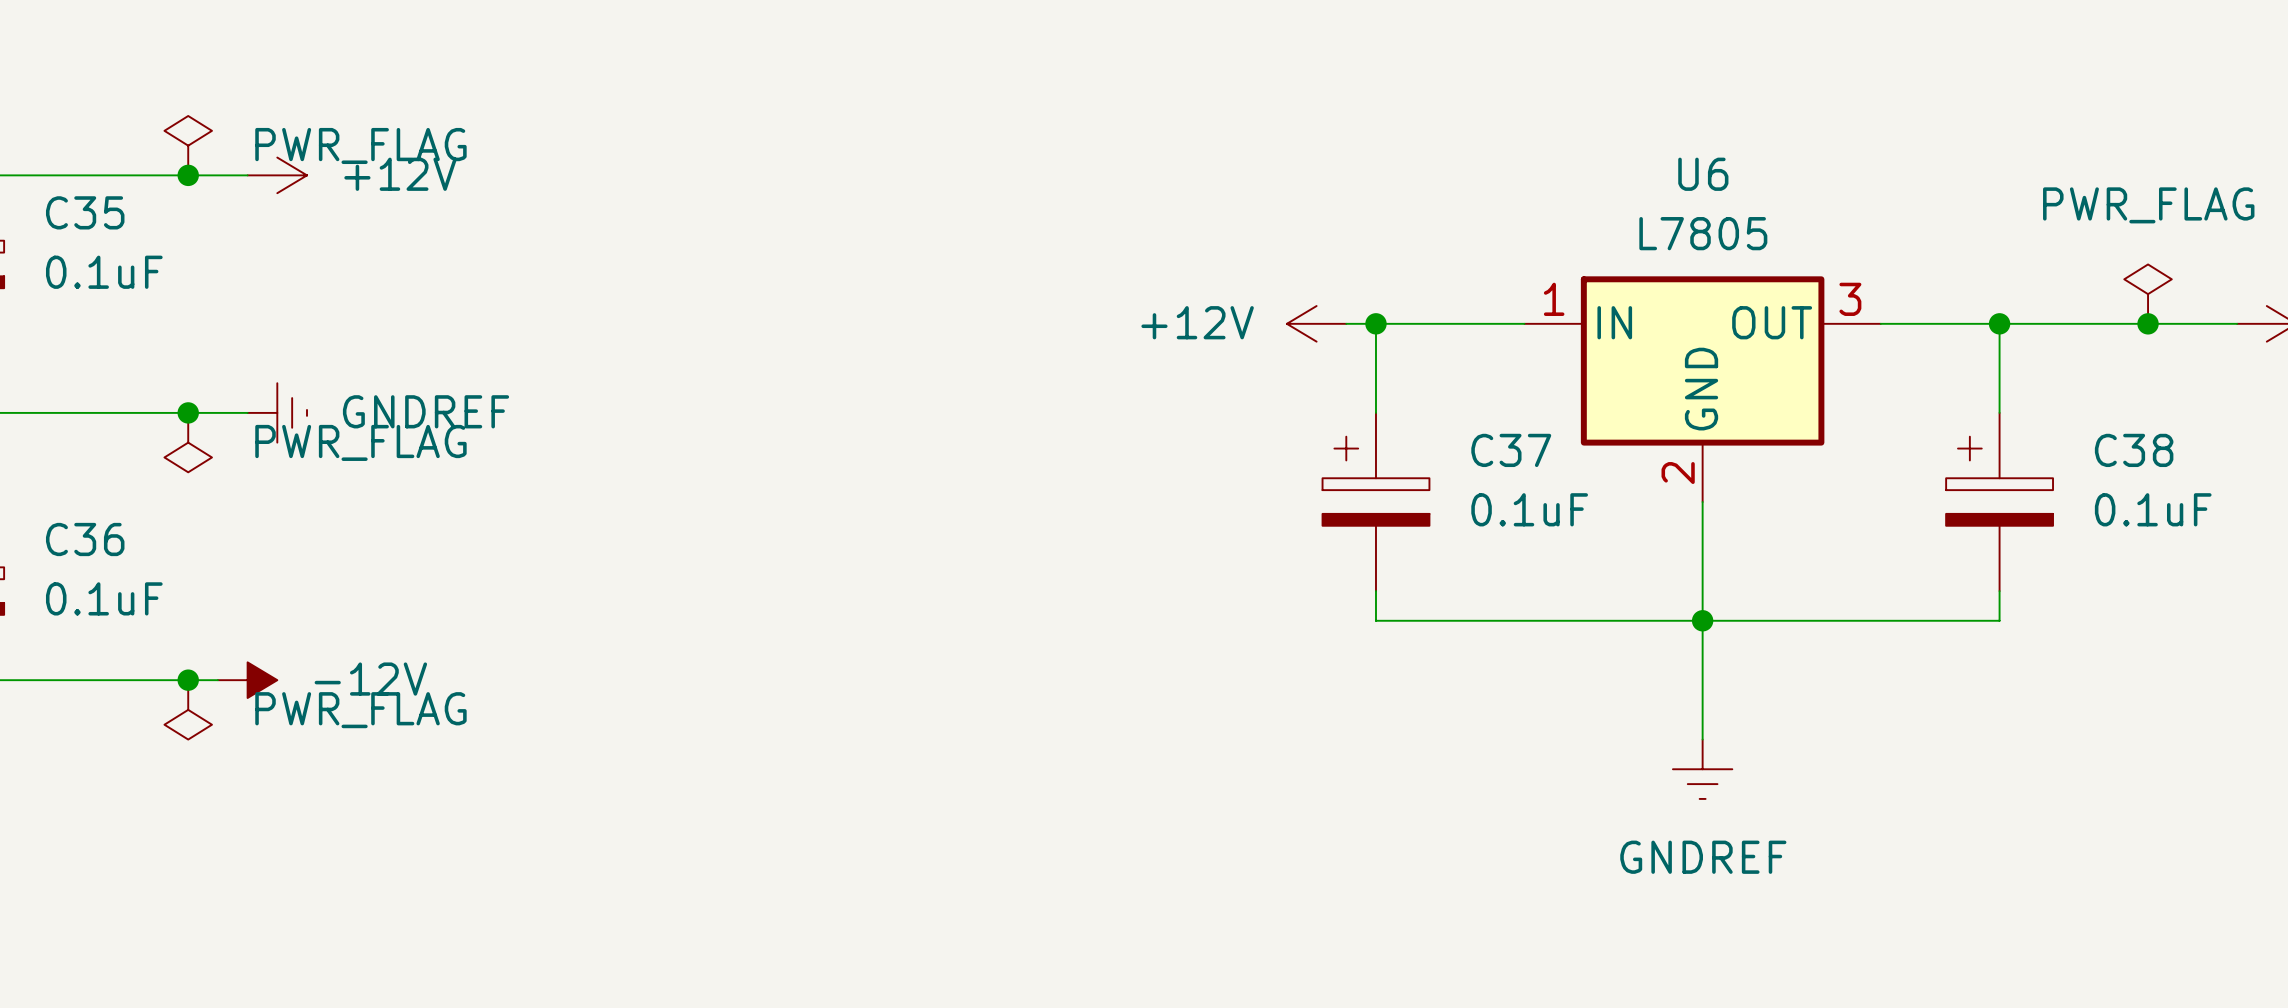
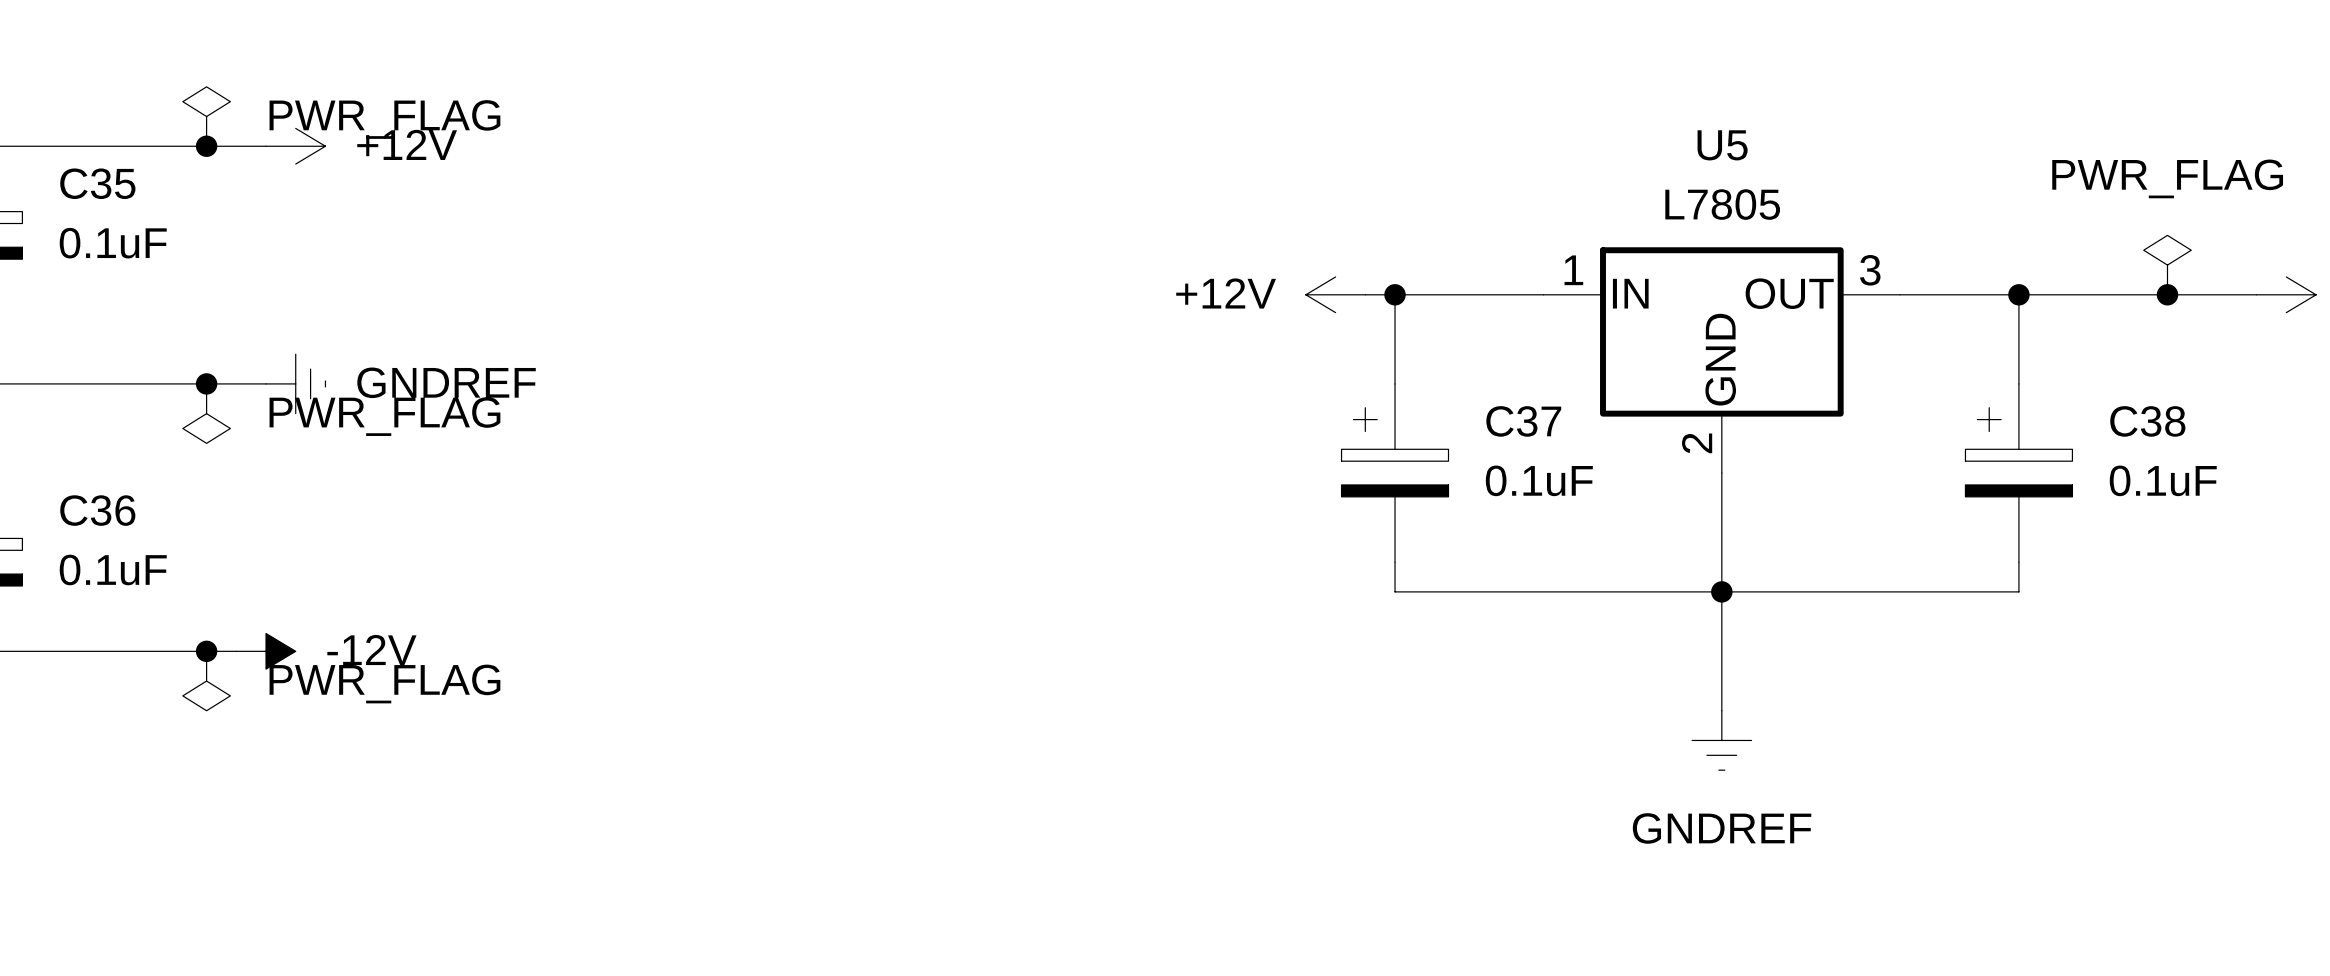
U6 name: U6 (1703, 174) -> U5 (1722, 145)

